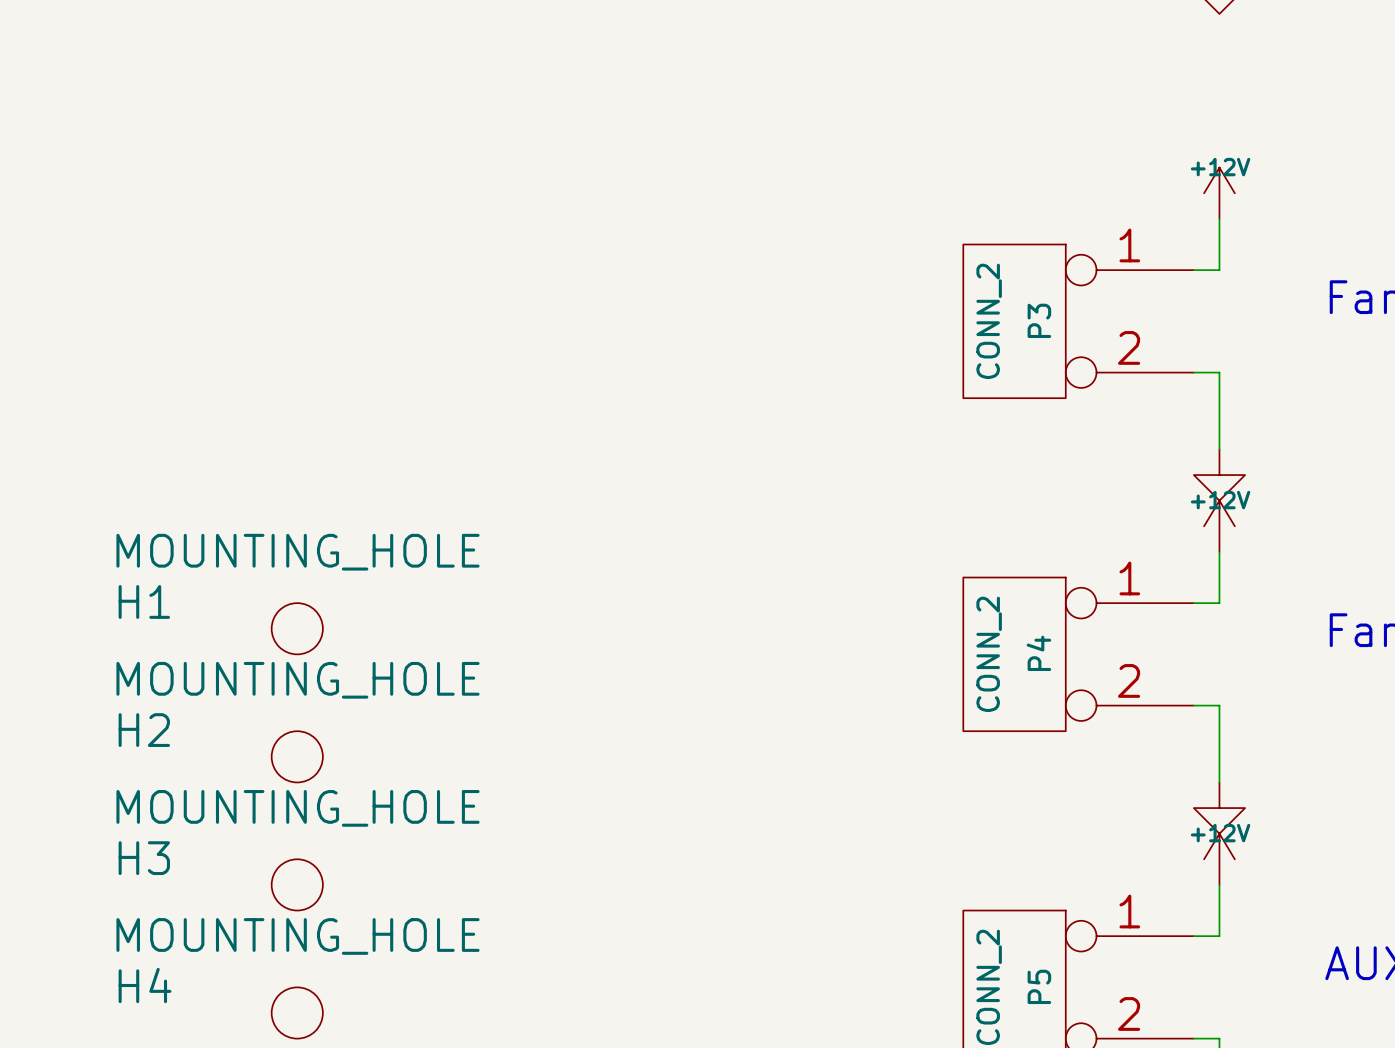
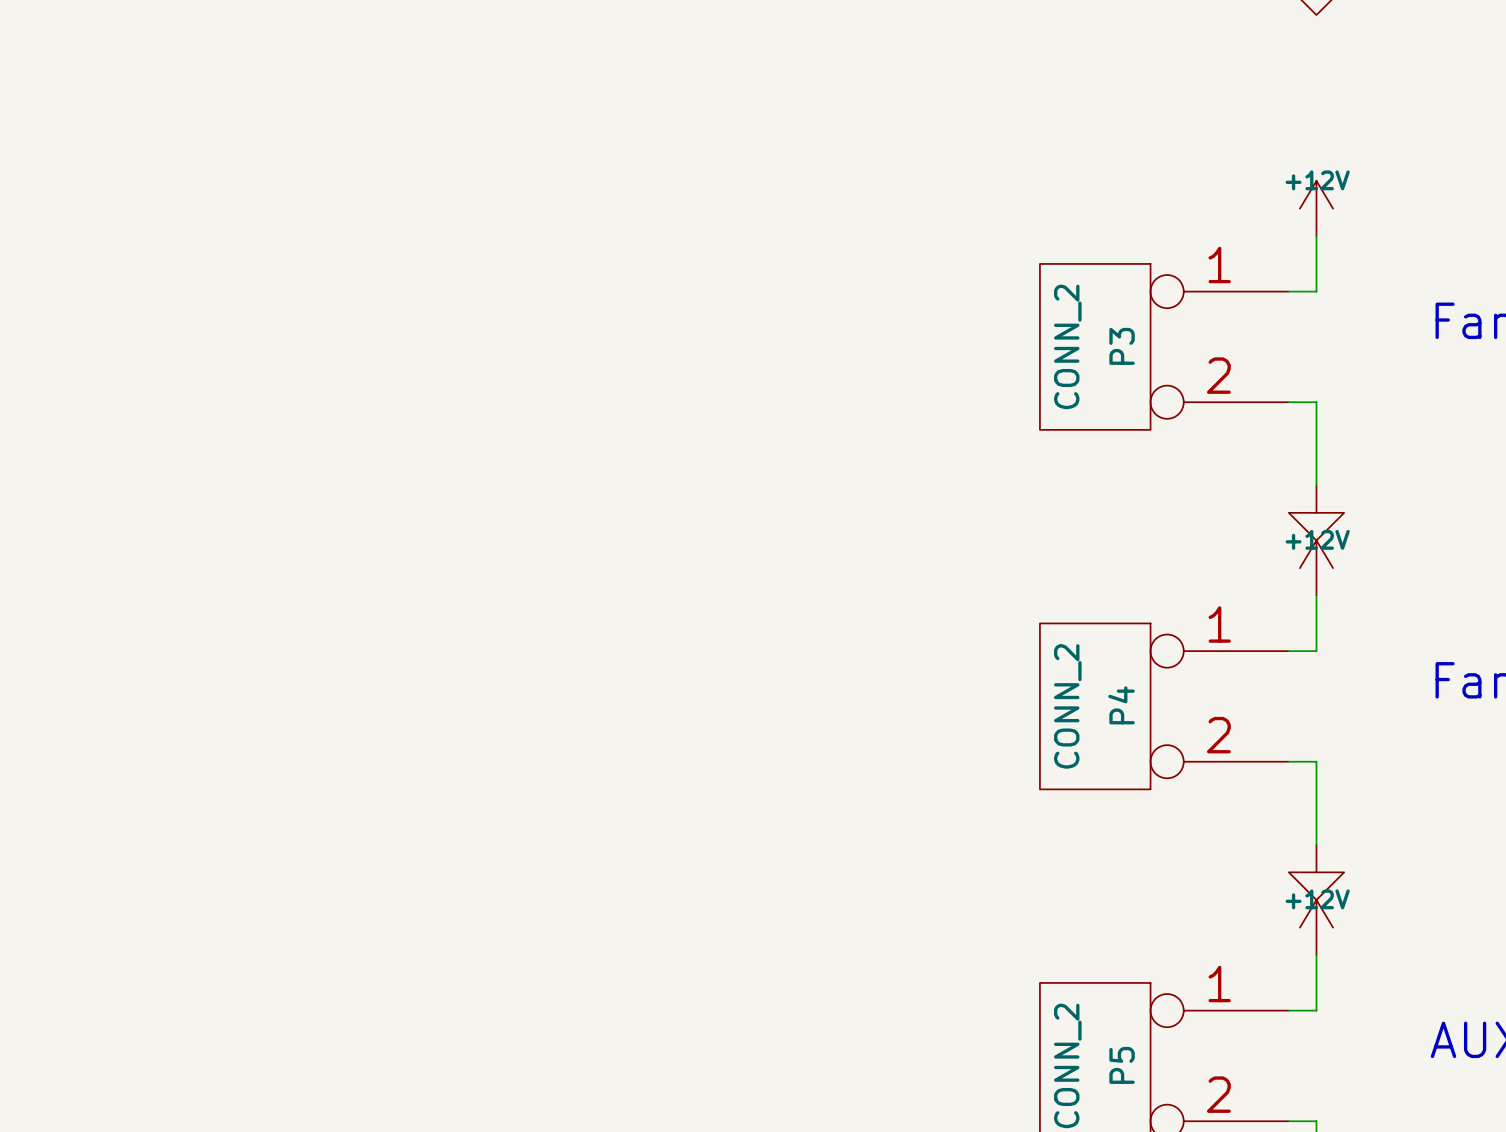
H1: MOUNTING_HOLE (297, 628) -> none
H2: MOUNTING_HOLE (297, 756) -> none
H3: MOUNTING_HOLE (297, 884) -> none
H4: MOUNTING_HOLE (297, 1012) -> none

